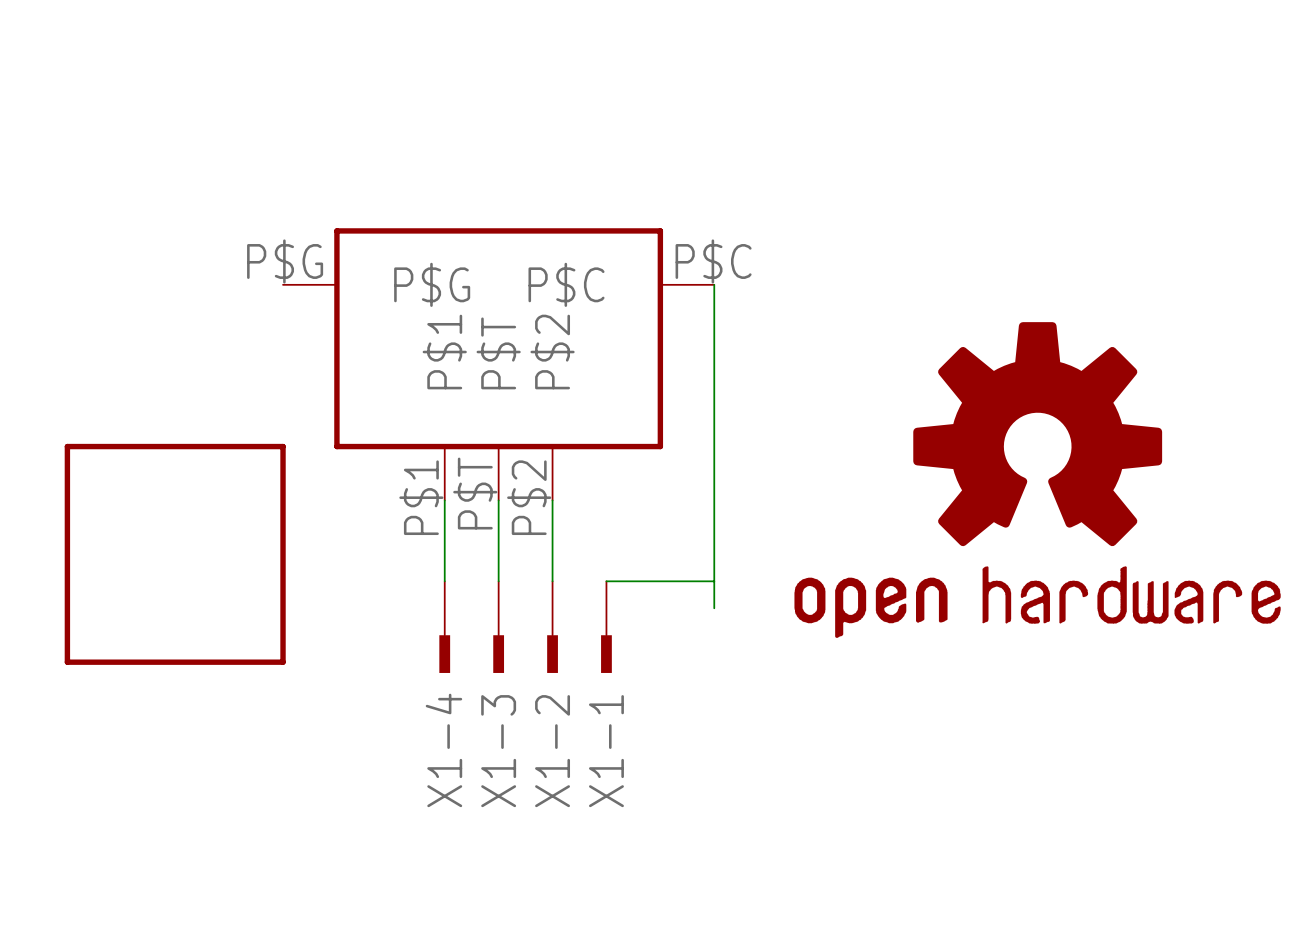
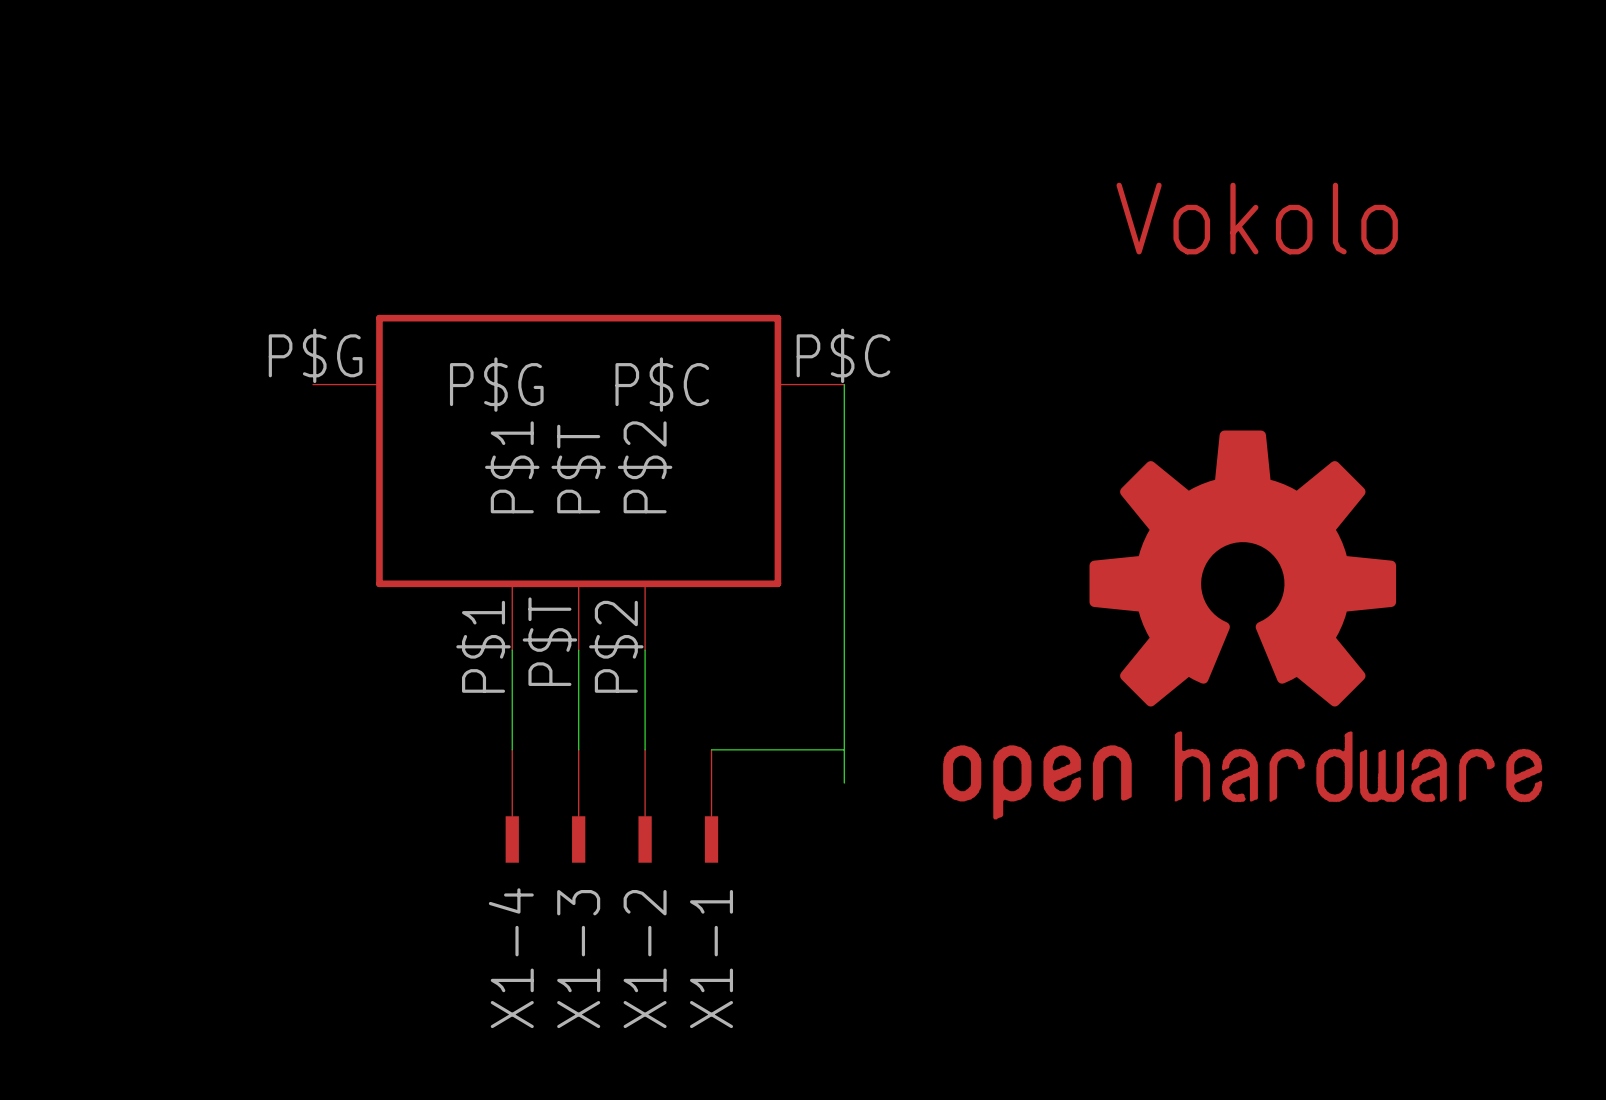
part: none -> (1257, 218)
part: (175, 554) -> none

